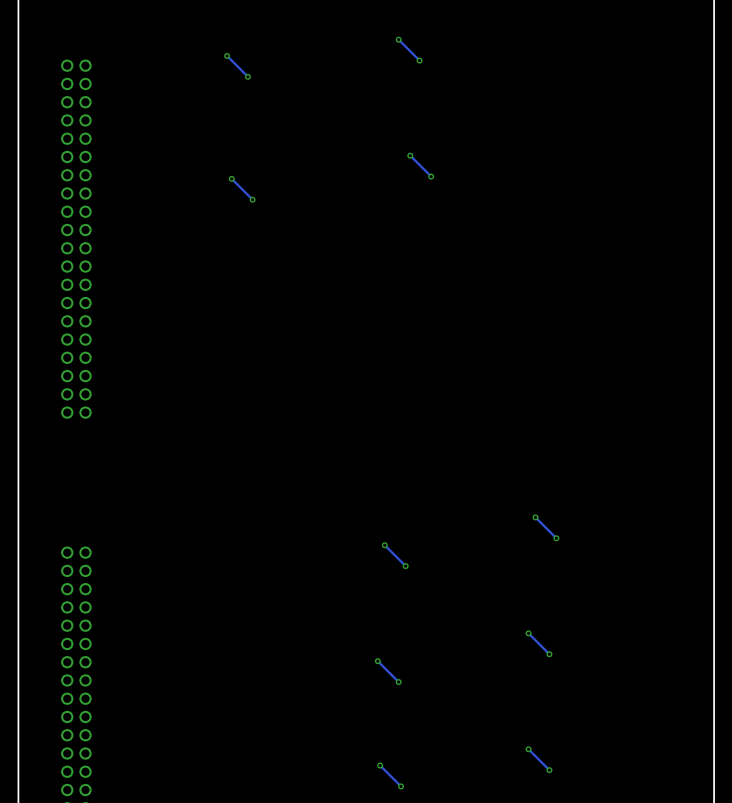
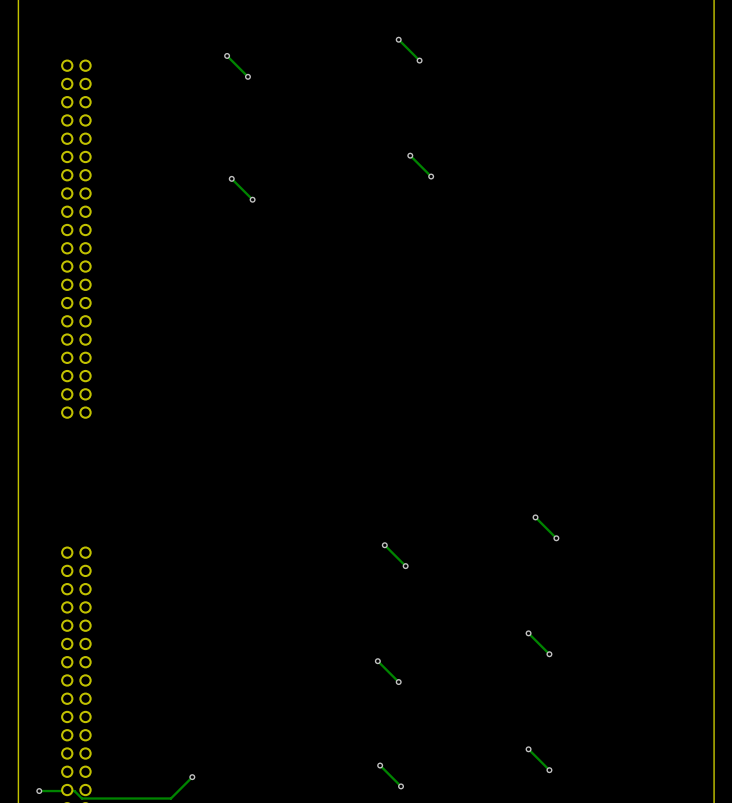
track: none -> (192, 777) (170, 798) (81, 798) (74, 791) (39, 791)
via: none -> (192, 777)
via: none -> (39, 791)

